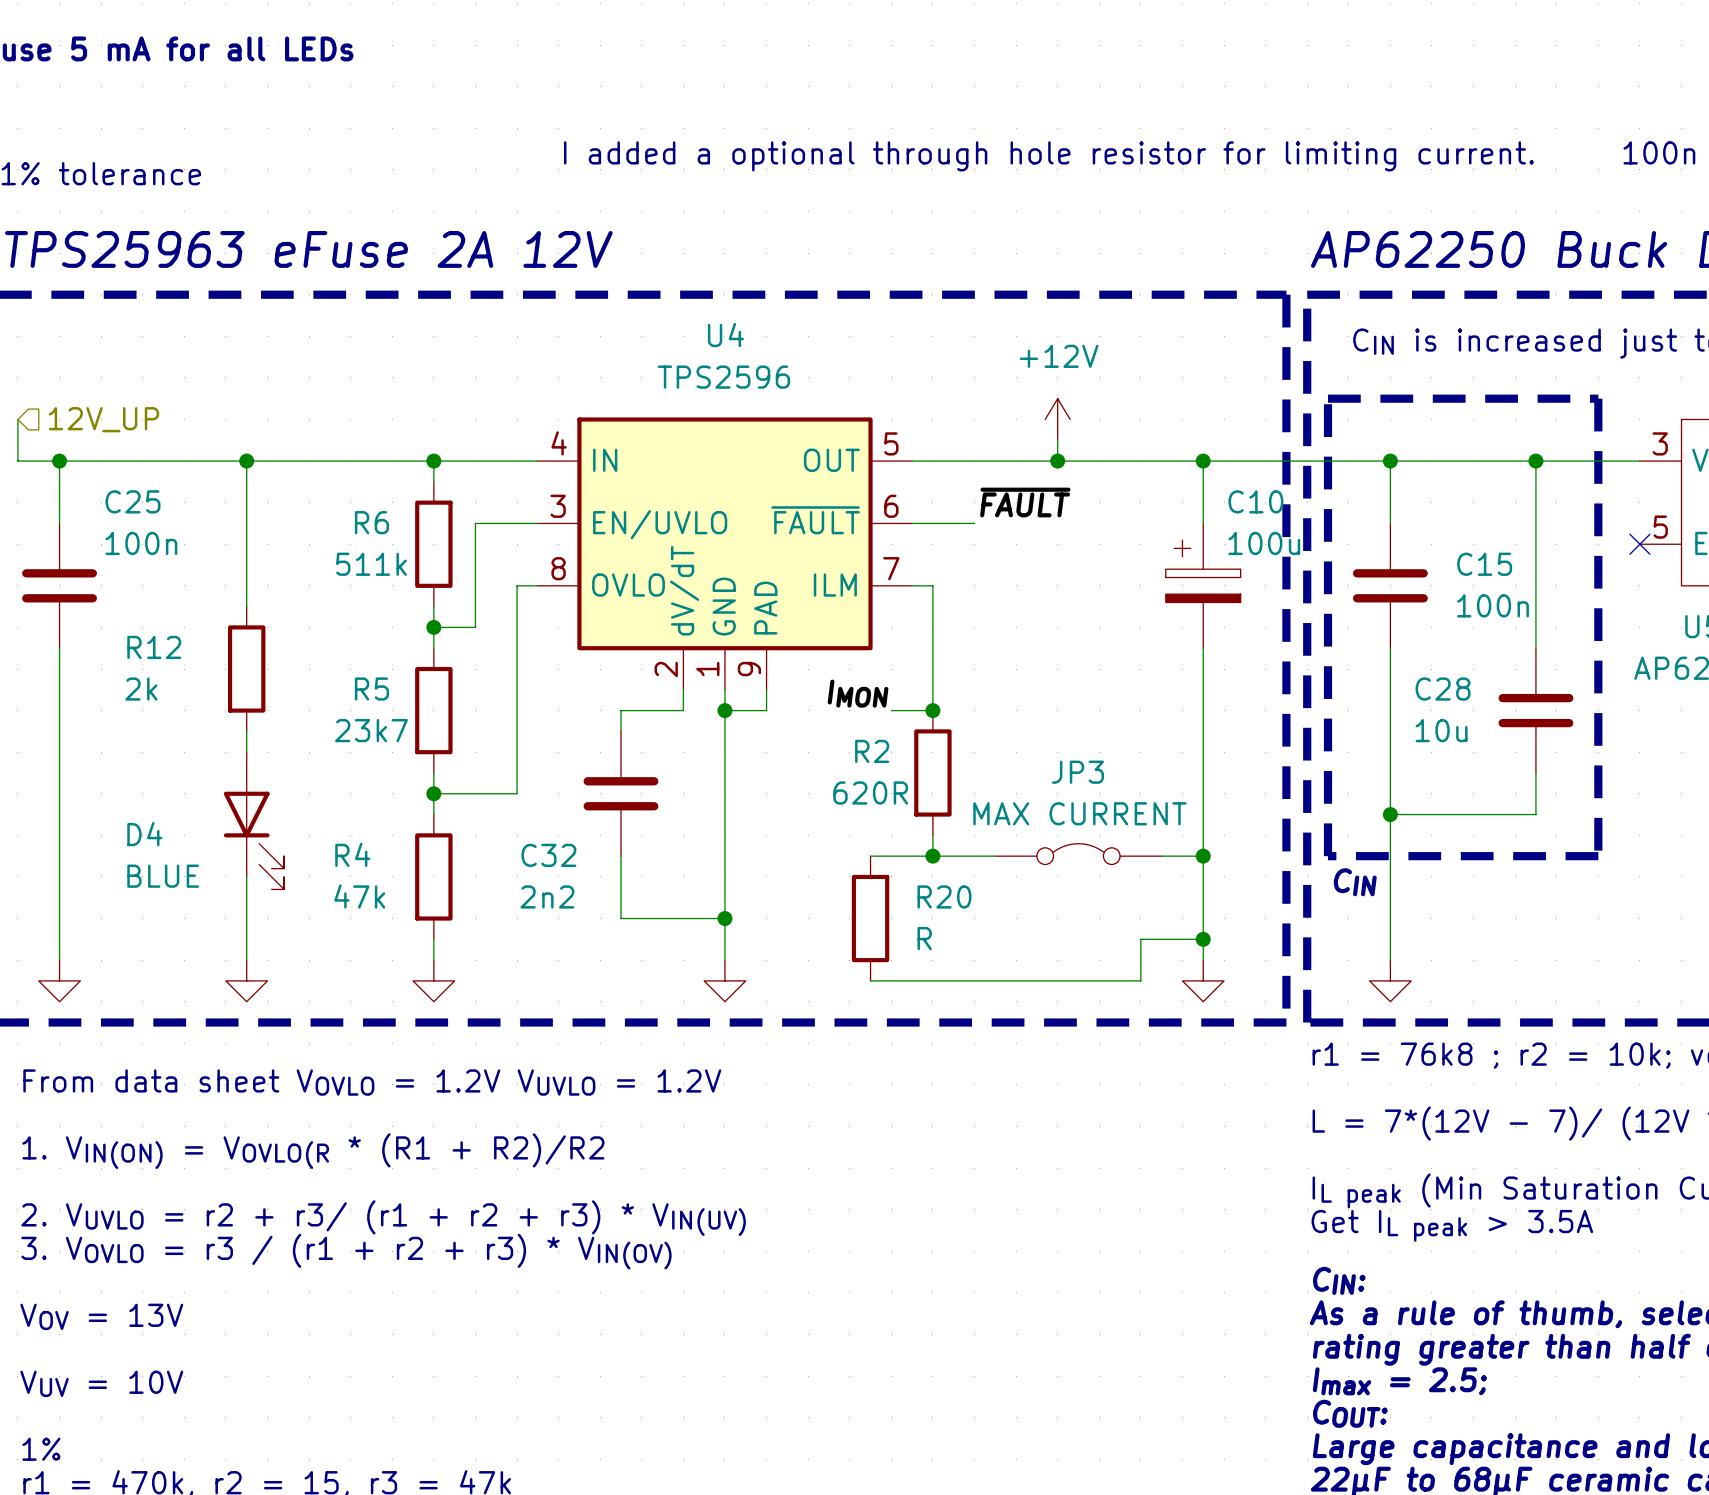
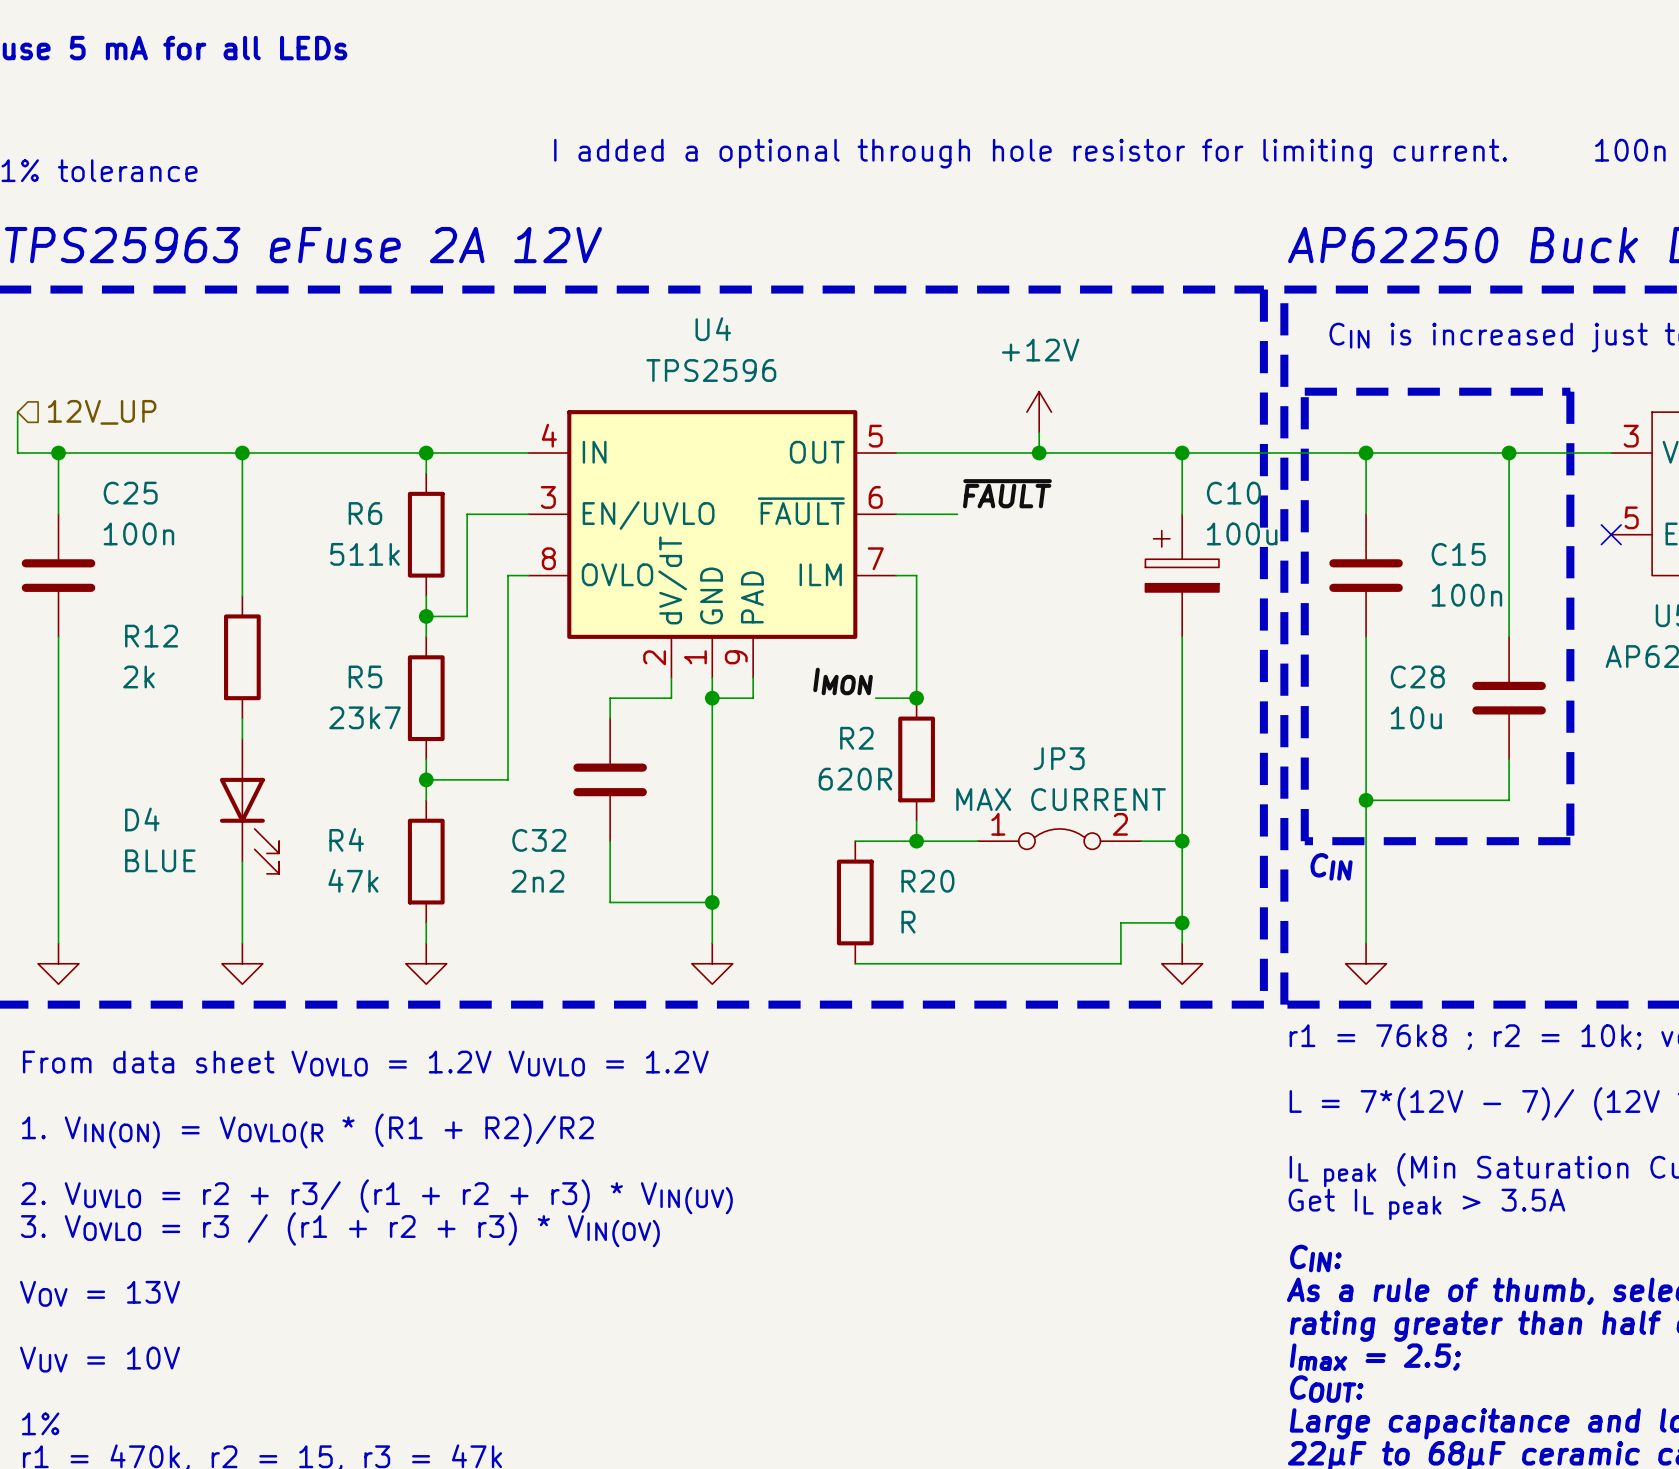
JP3 pin number: none -> 1 (998, 824)
JP3 pin number: none -> 2 (1120, 824)

